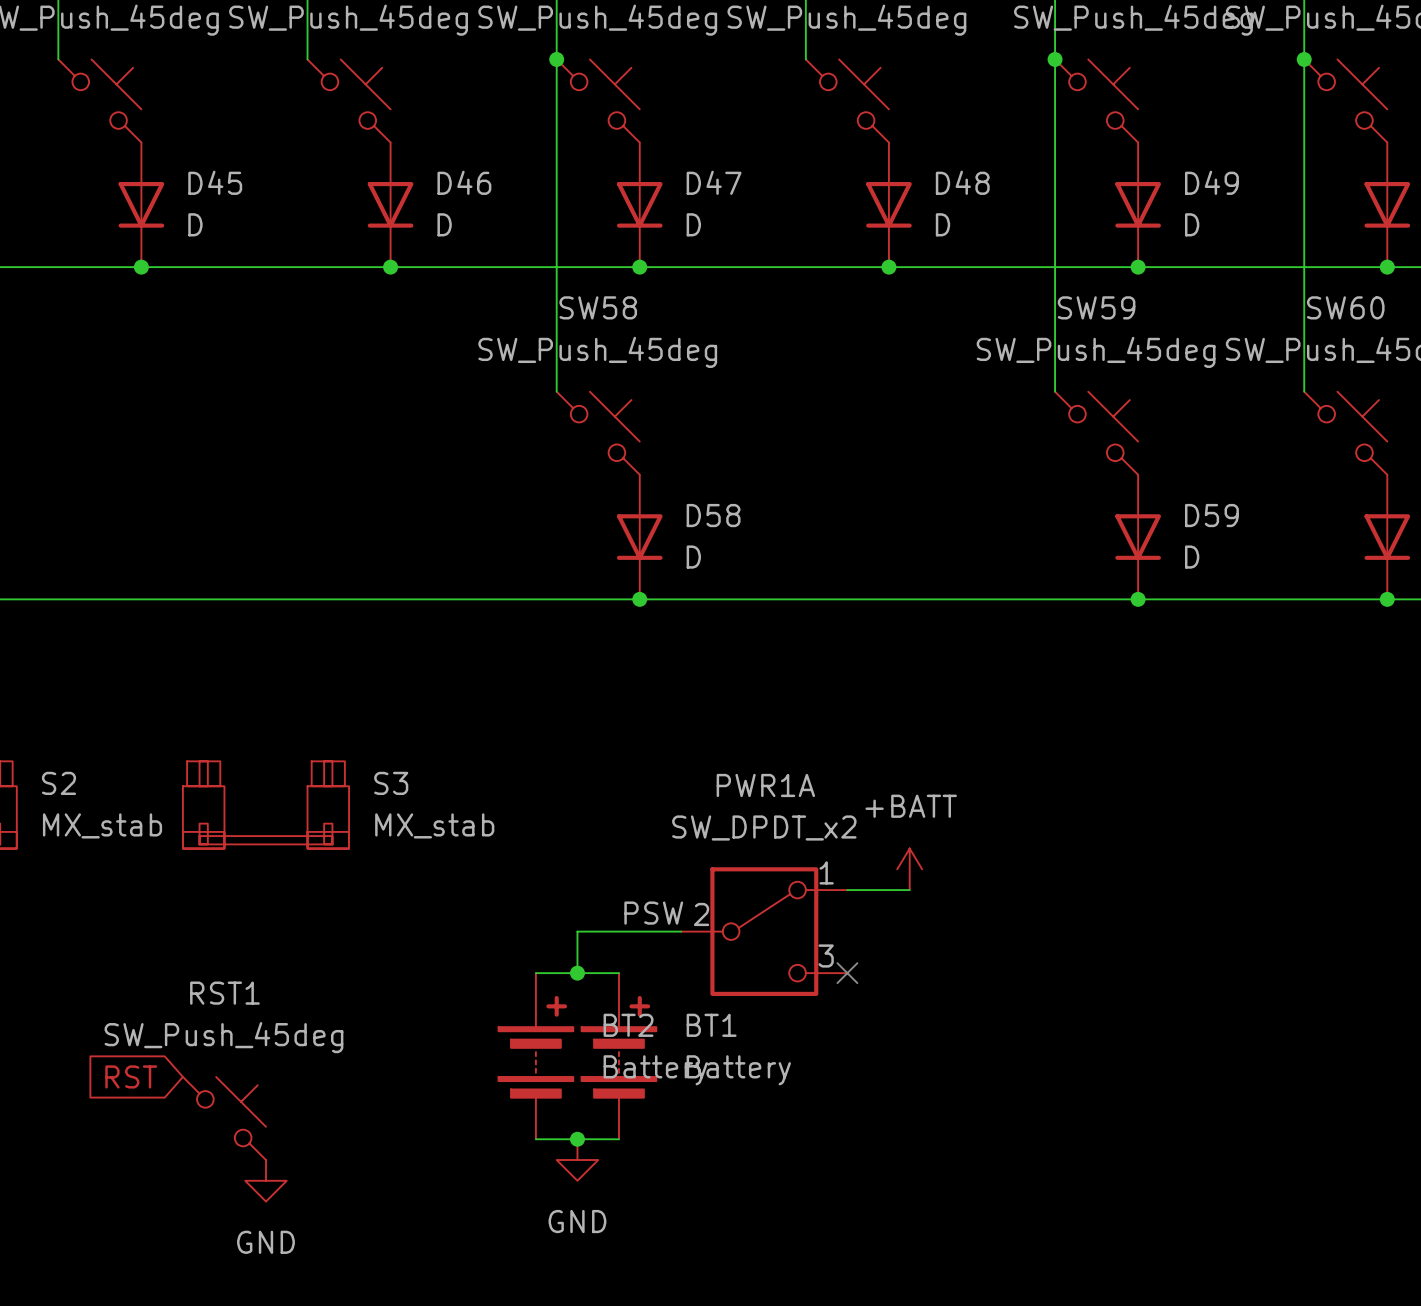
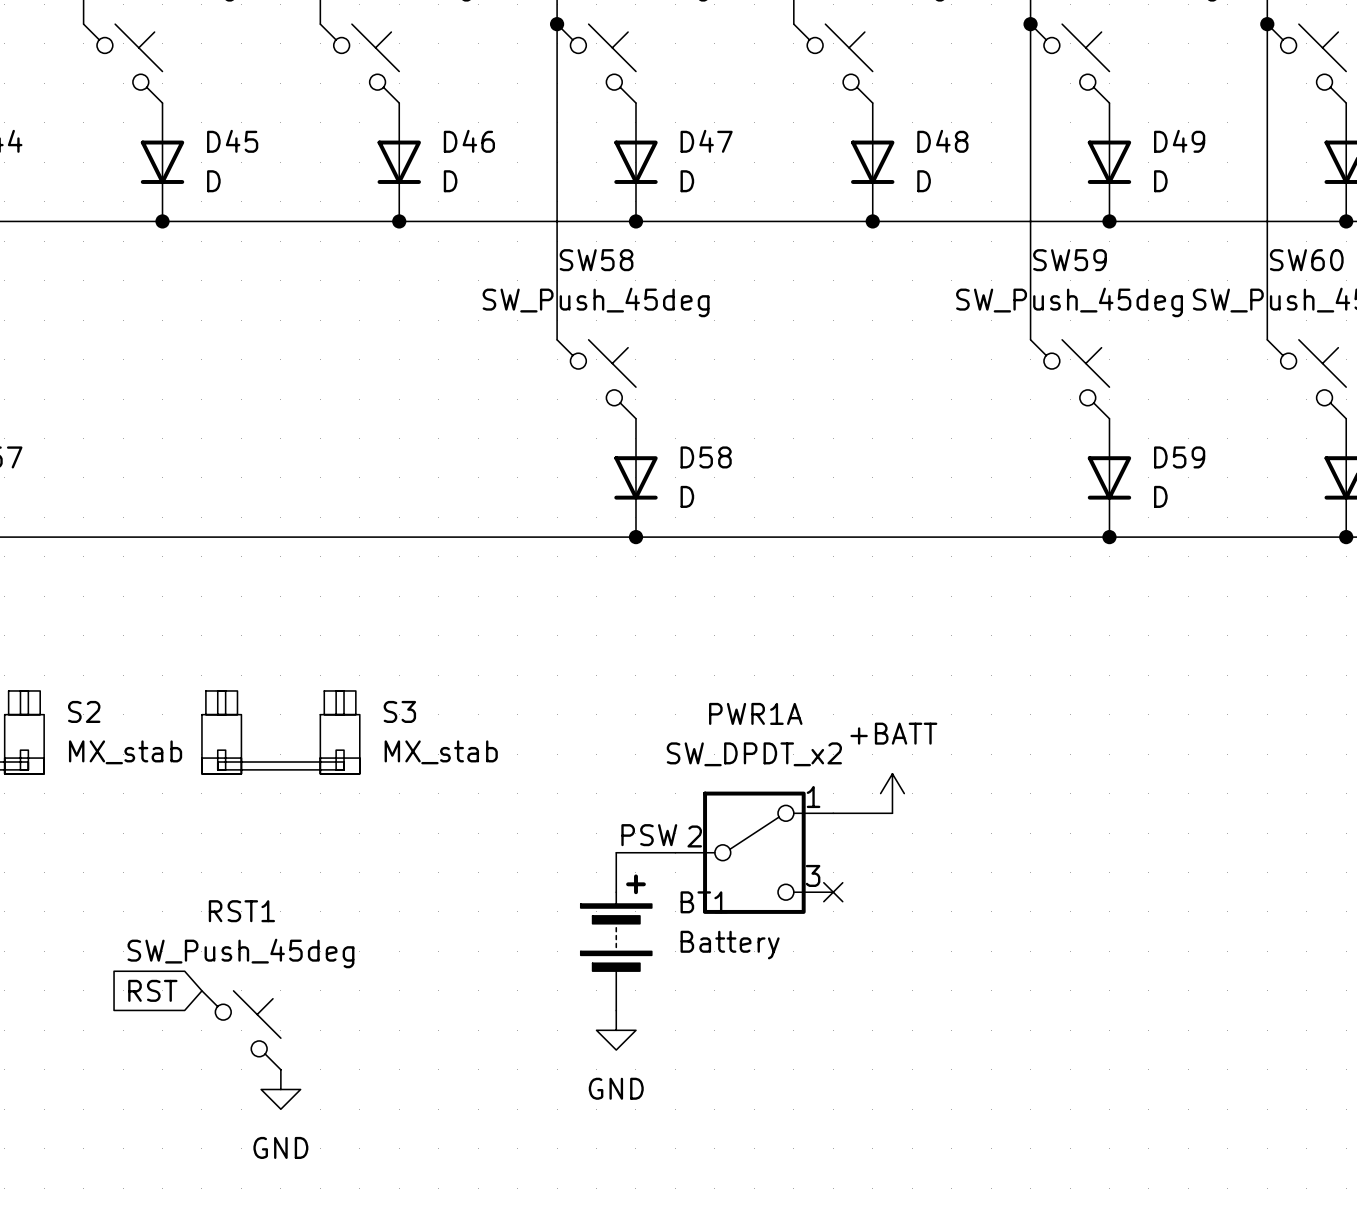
wire: (618, 931) (577, 931) (577, 973) -> none
wire: (535, 973) (618, 973) -> none
junction: (577, 973) -> none
BT2: Battery (535, 1056) -> none
BT1 position: (618, 1056) -> (616, 931)
wire: (535, 1139) (618, 1139) -> none
junction: (577, 1139) -> none
power symbol position: GND (577, 1160) -> GND (616, 1030)

